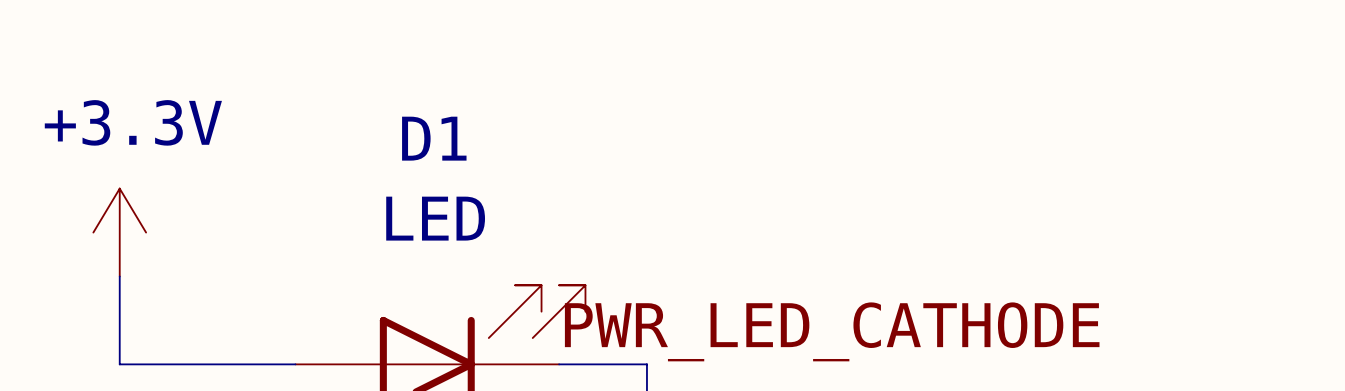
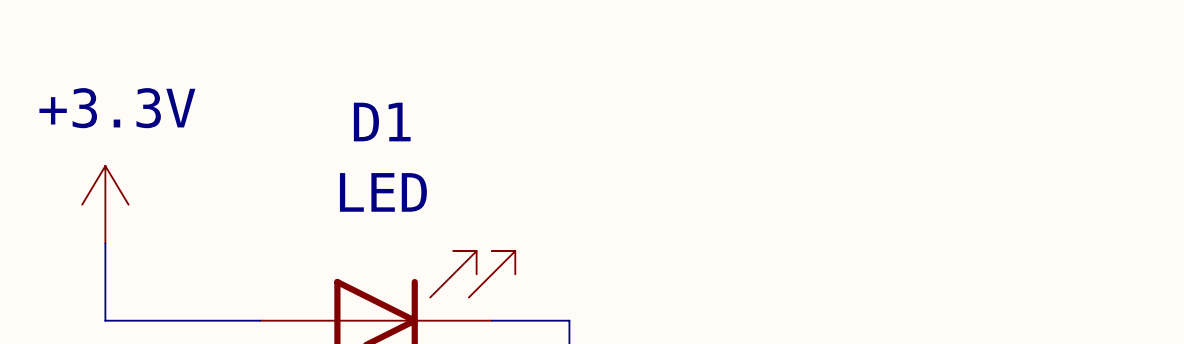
label: PWR_LED_CATHODE (832, 331) -> none

